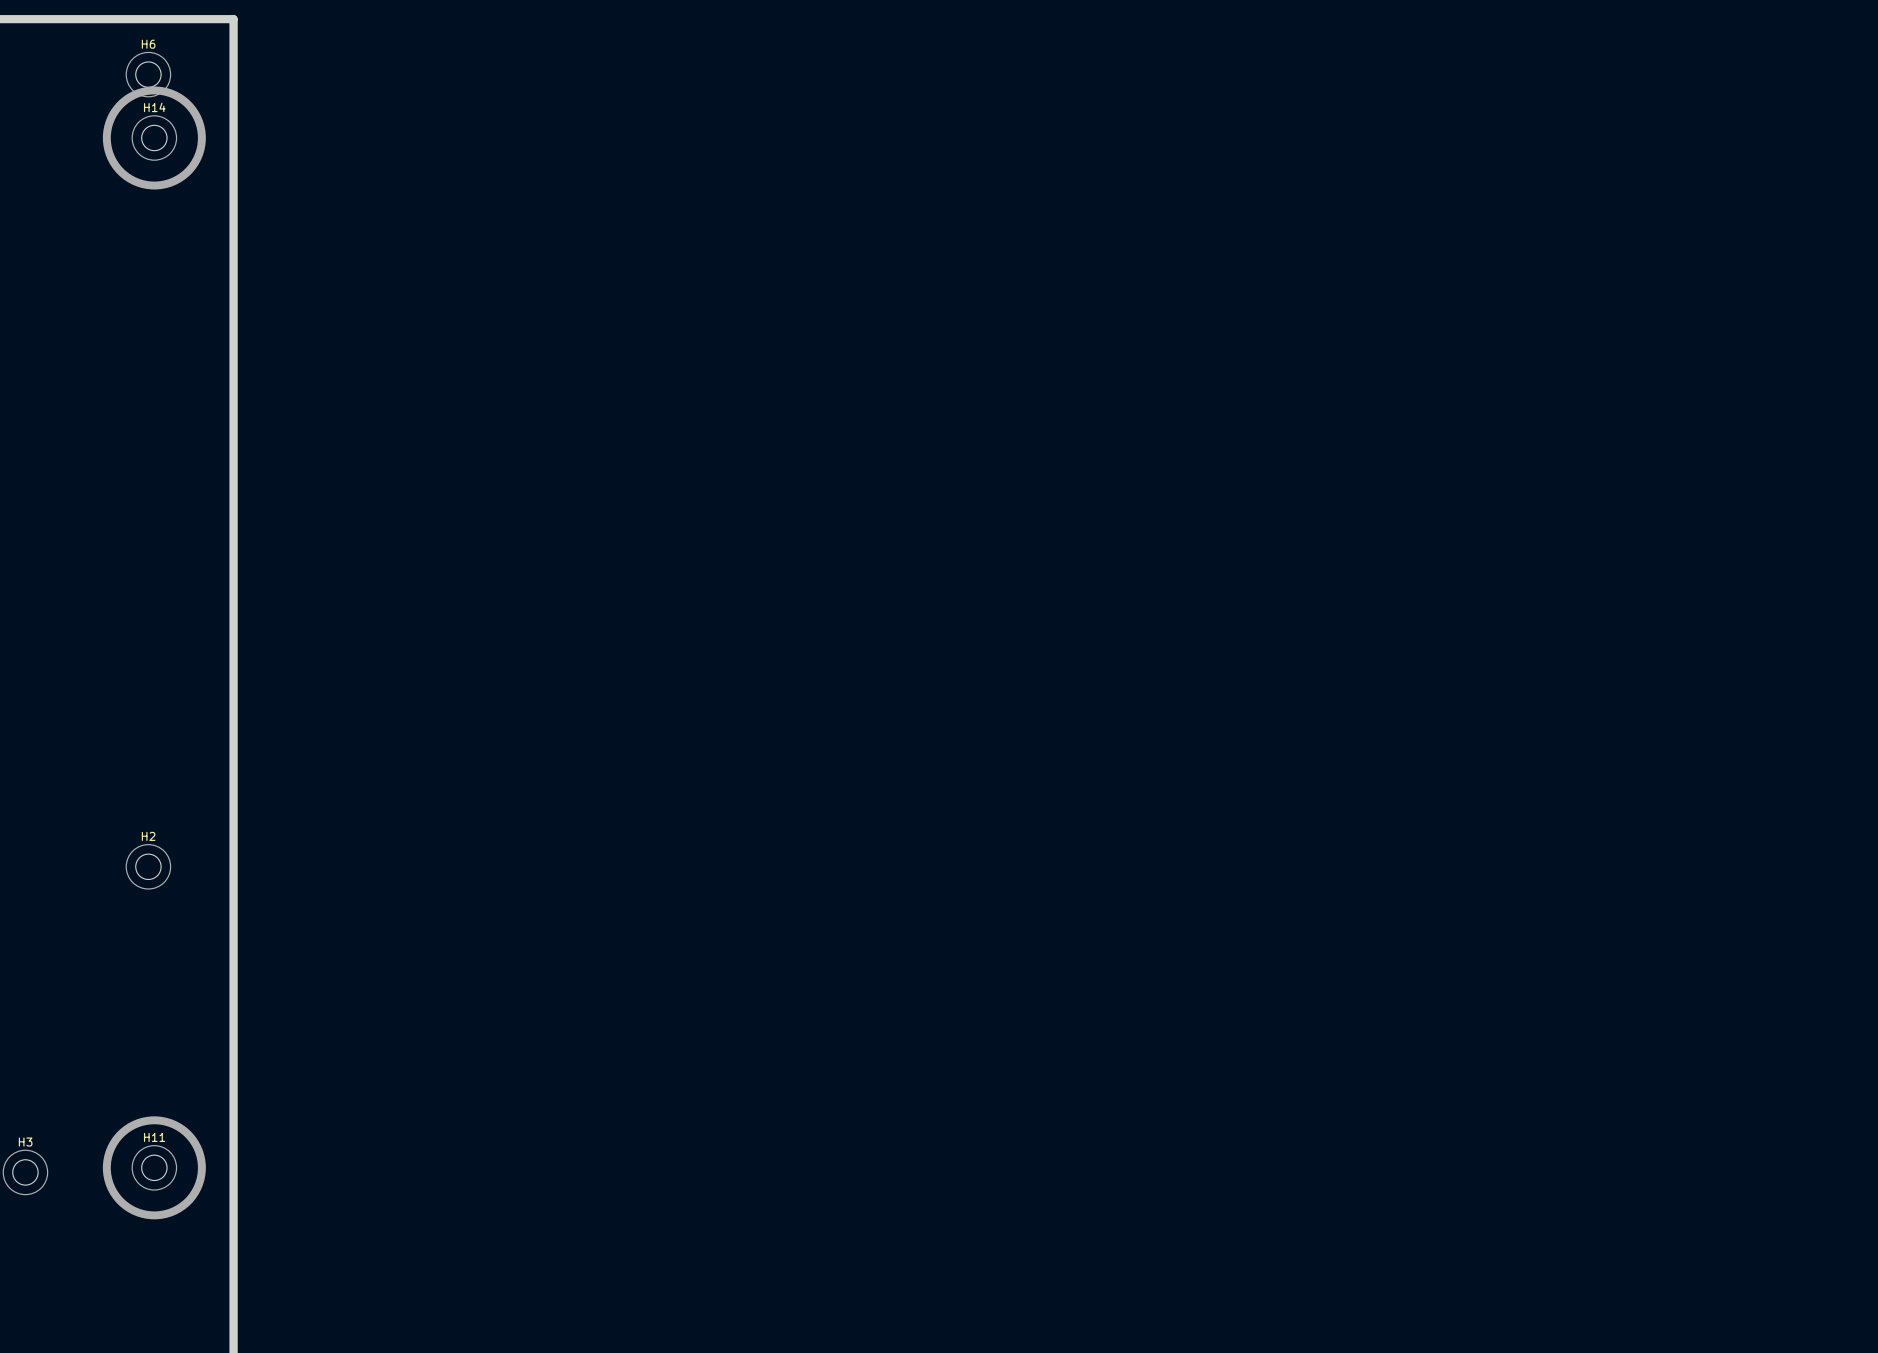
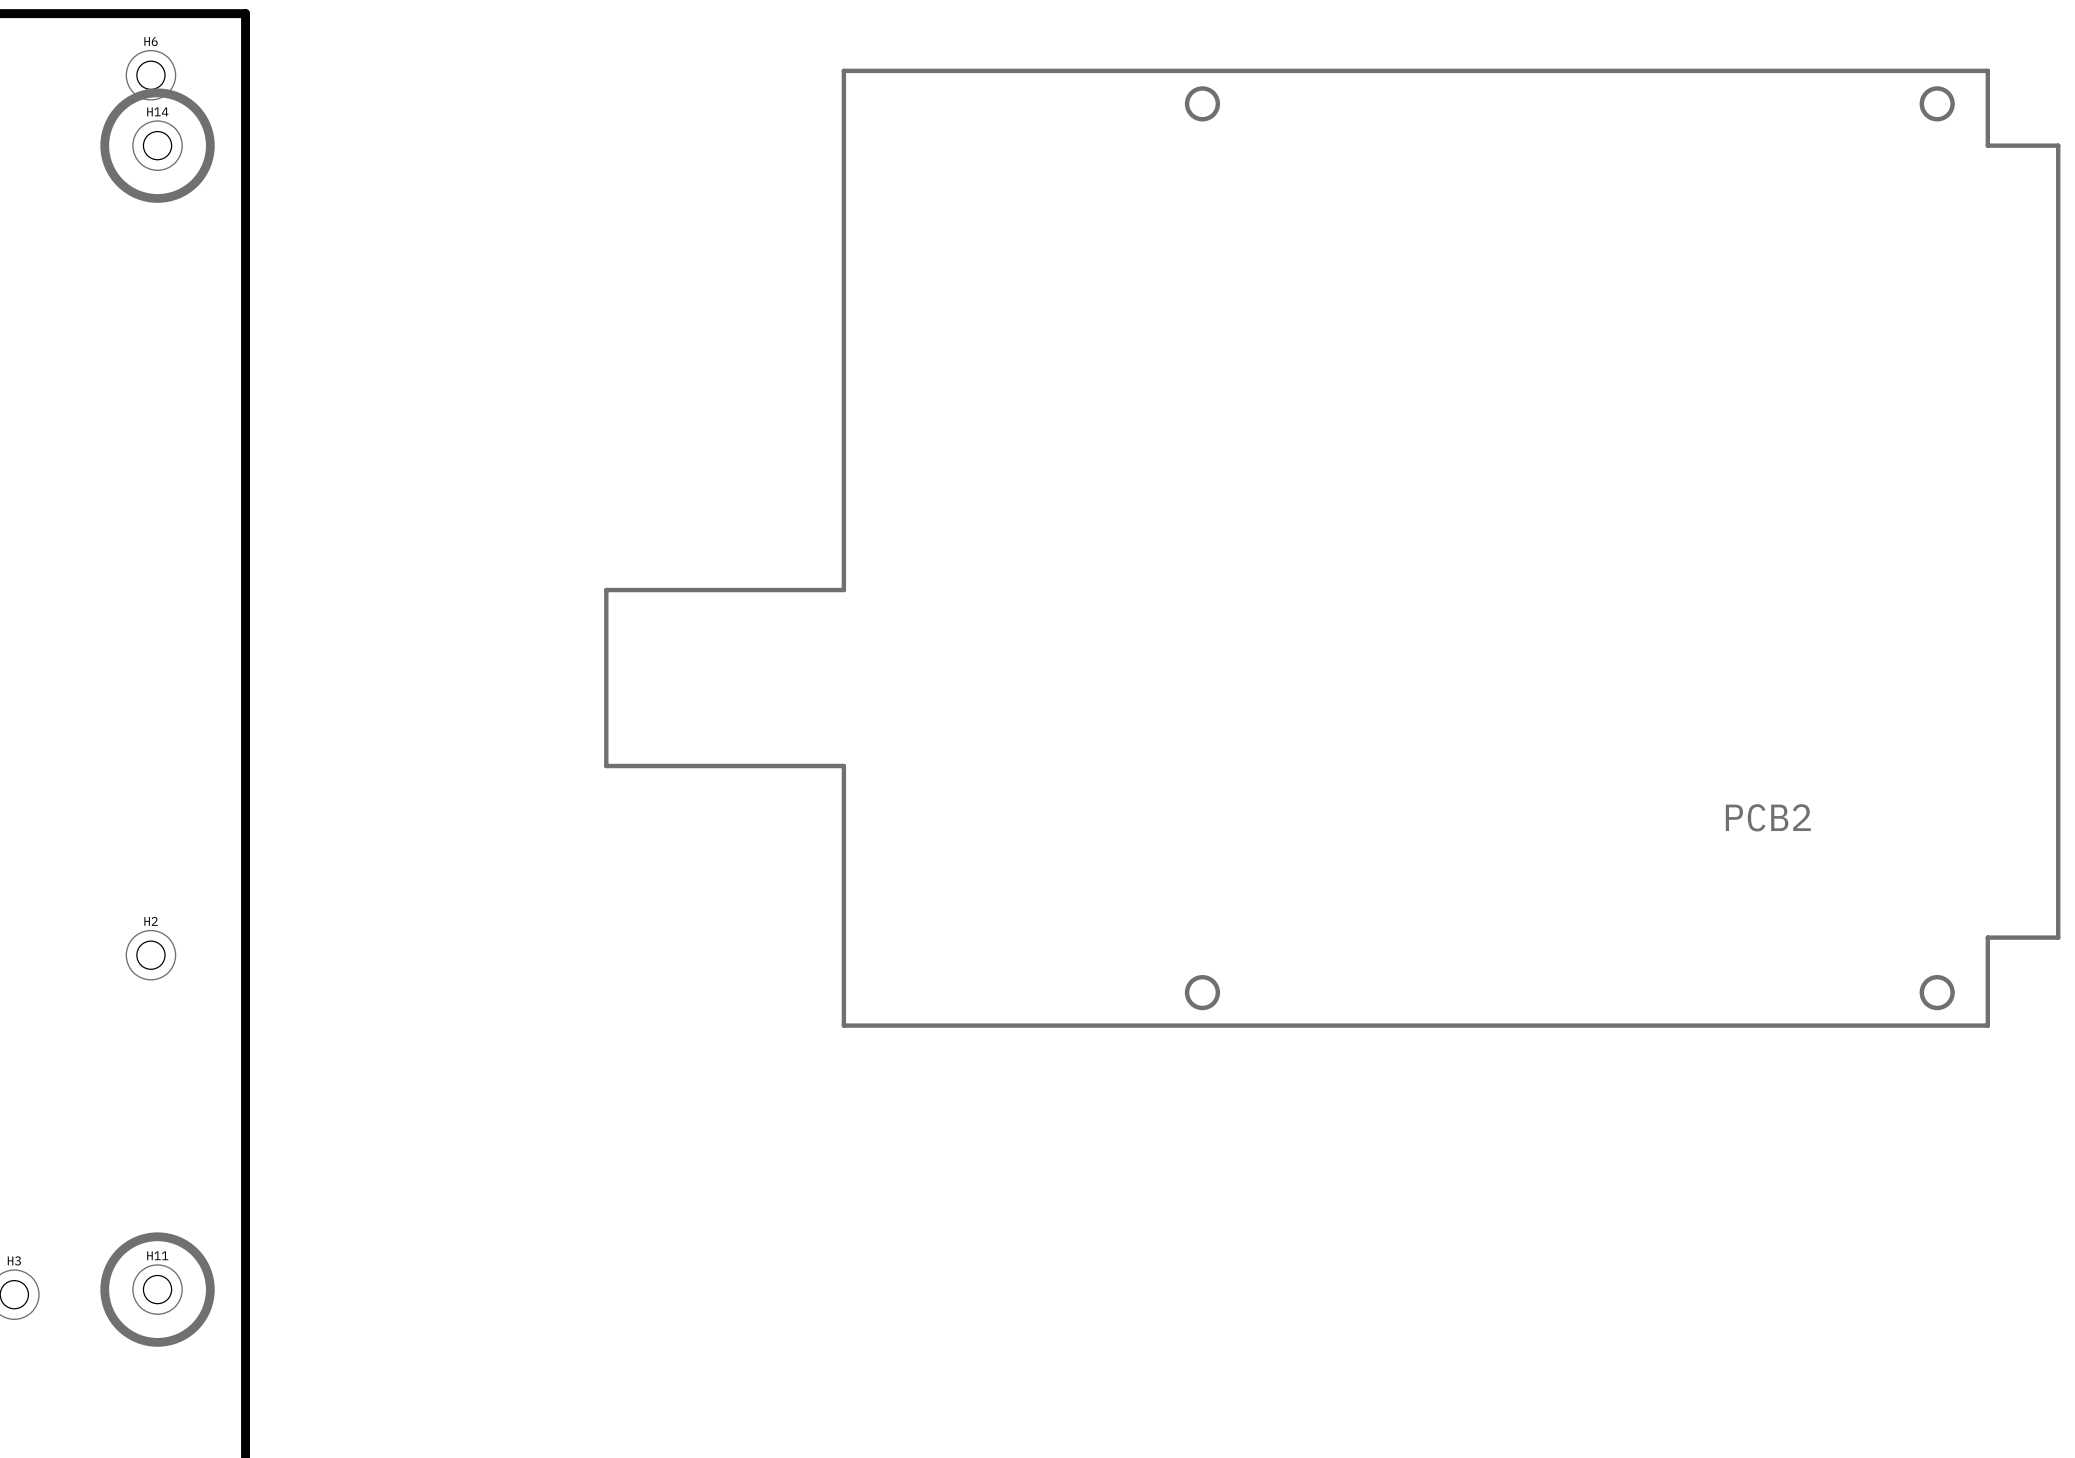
line: none -> (843, 70) (843, 590) (606, 590) (606, 766) (843, 766) (843, 1025) (1987, 1025) (1987, 937) (2058, 937) (2058, 145) (1987, 145) (1987, 70) (843, 70)
drawing: none -> [1184, 86, 1221, 122]
drawing: none -> [1919, 86, 1955, 122]
text: none -> PCB2 (1768, 817)
drawing: none -> [1184, 975, 1221, 1011]
drawing: none -> [1919, 975, 1955, 1011]

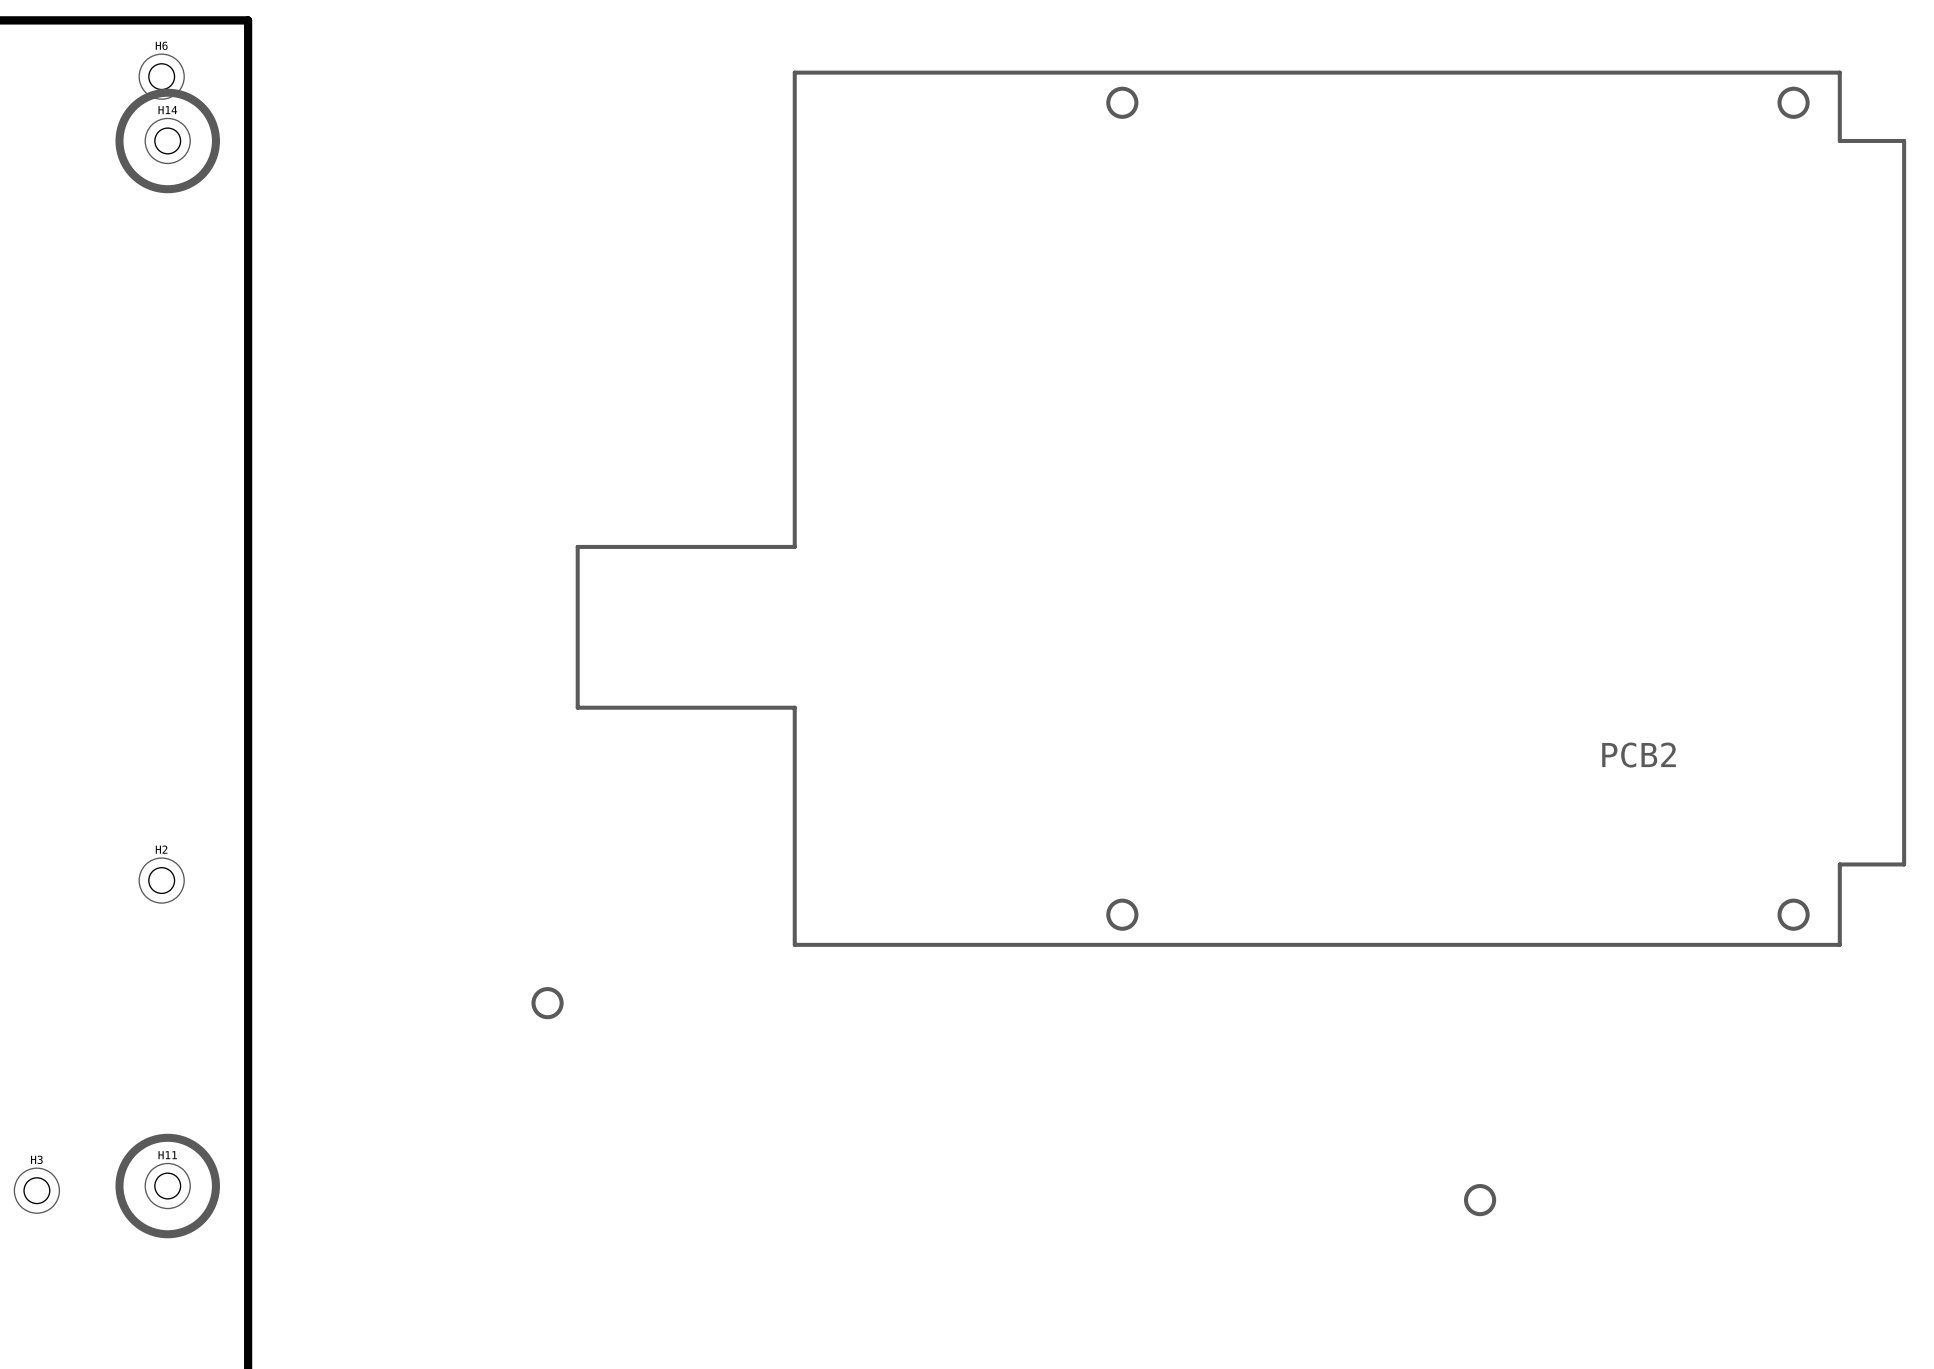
drawing: none -> [531, 987, 564, 1020]
drawing: none -> [1463, 1184, 1497, 1217]

